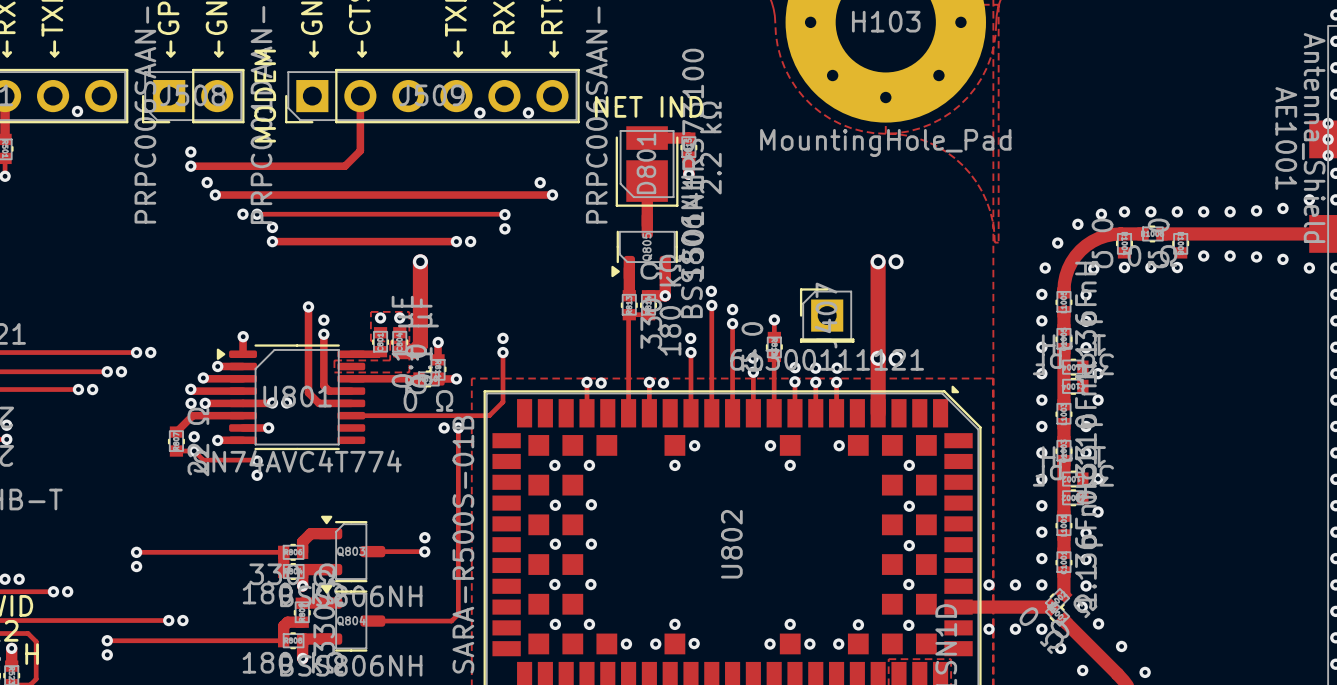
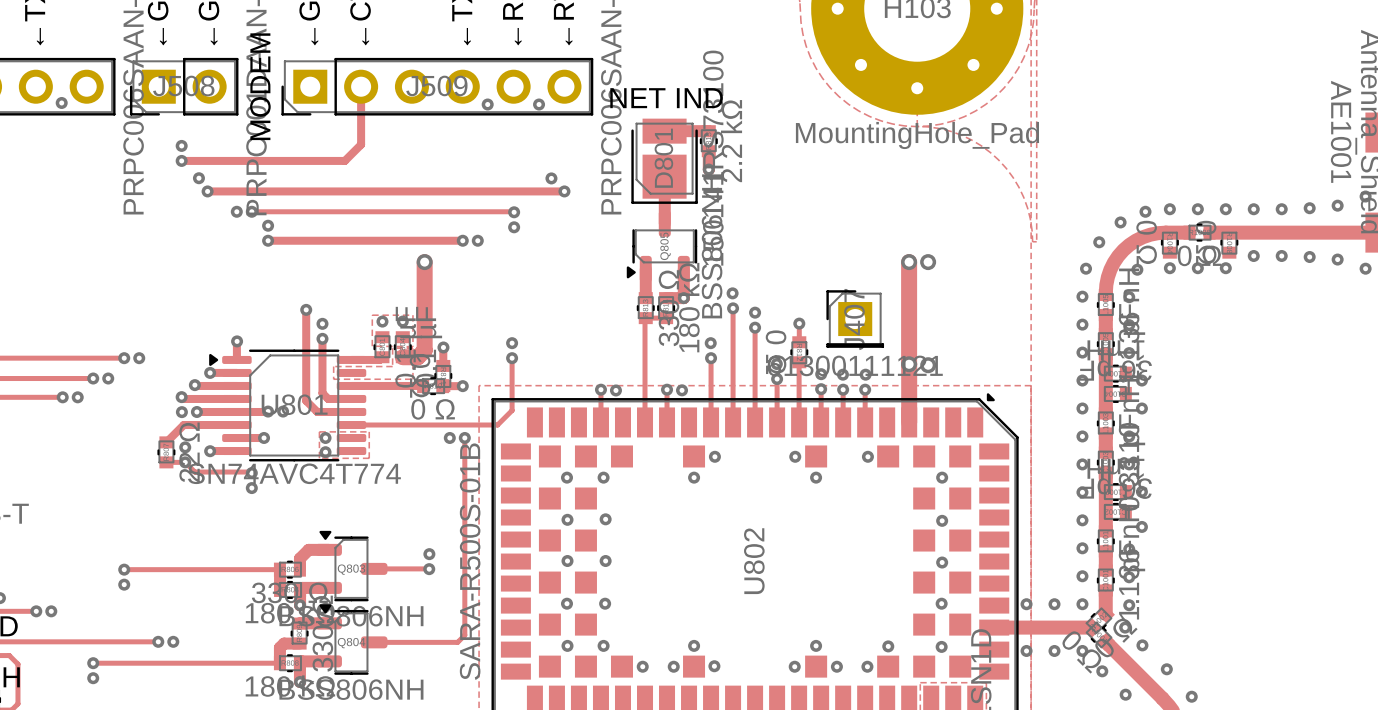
zone outline: none -> (319, 431) (319, 458) (369, 458) (369, 431) (319, 431)
via: none -> (325, 437)
via: none -> (325, 452)

